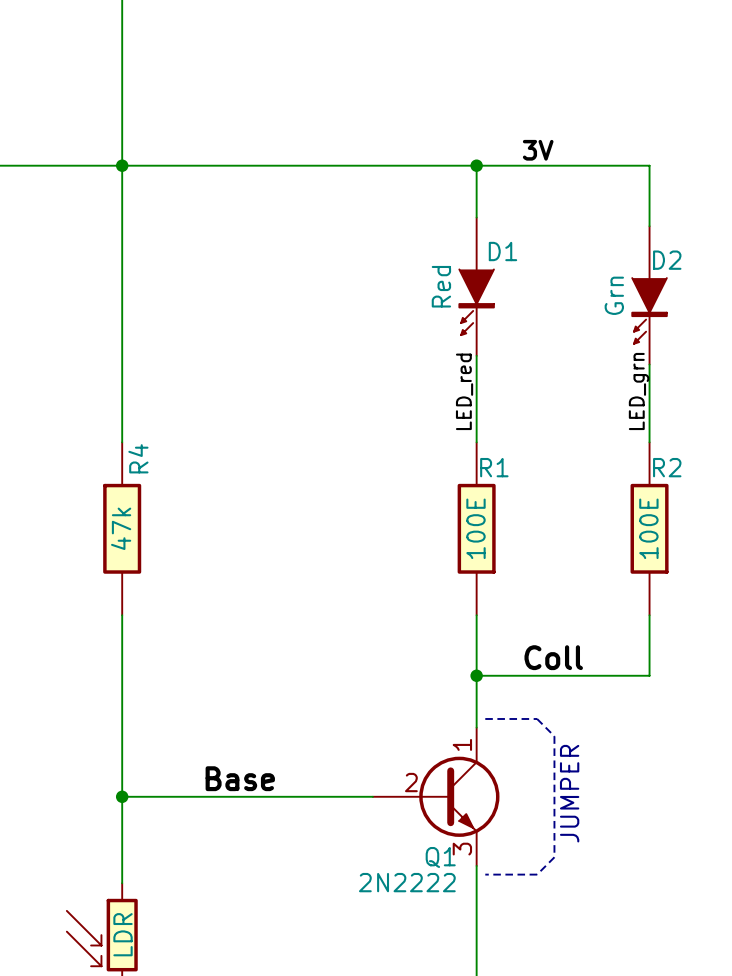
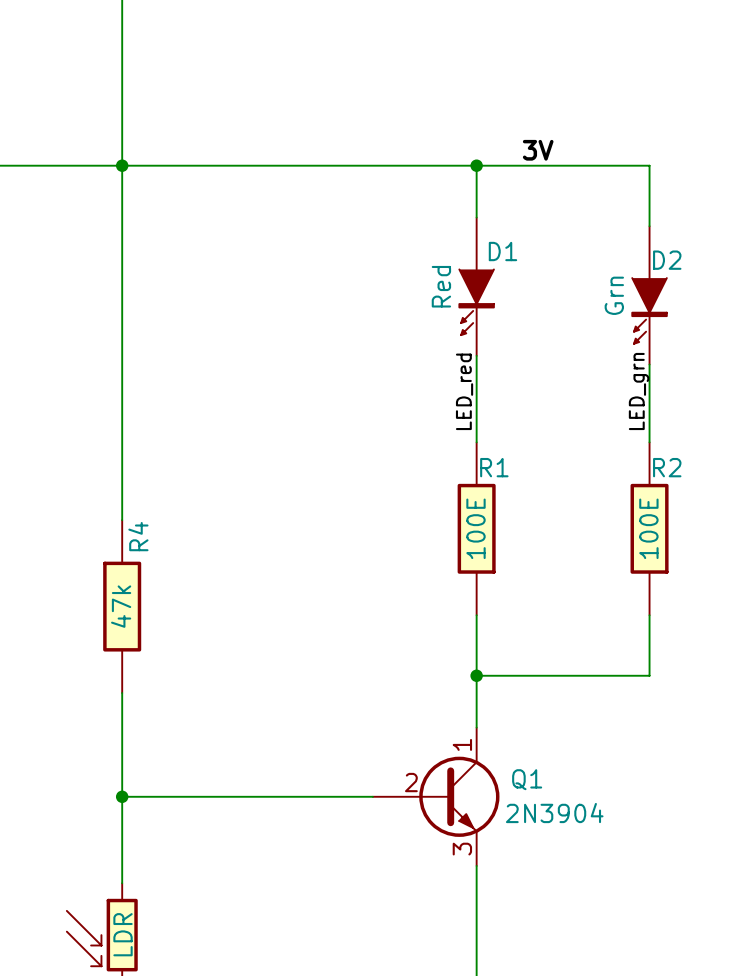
R4 position: (122, 528) -> (122, 606)
label: Coll (553, 657) -> none
line: (485, 718) (537, 718) (554, 736) (554, 857) (537, 874) (485, 874) -> none
label: Base (240, 778) -> none
text: JUMPER (569, 793) -> none
Q1 name position: Q1 (440, 857) -> Q1 (527, 779)
Q1 value: 2N2222 (407, 882) -> 2N3904 (554, 813)

